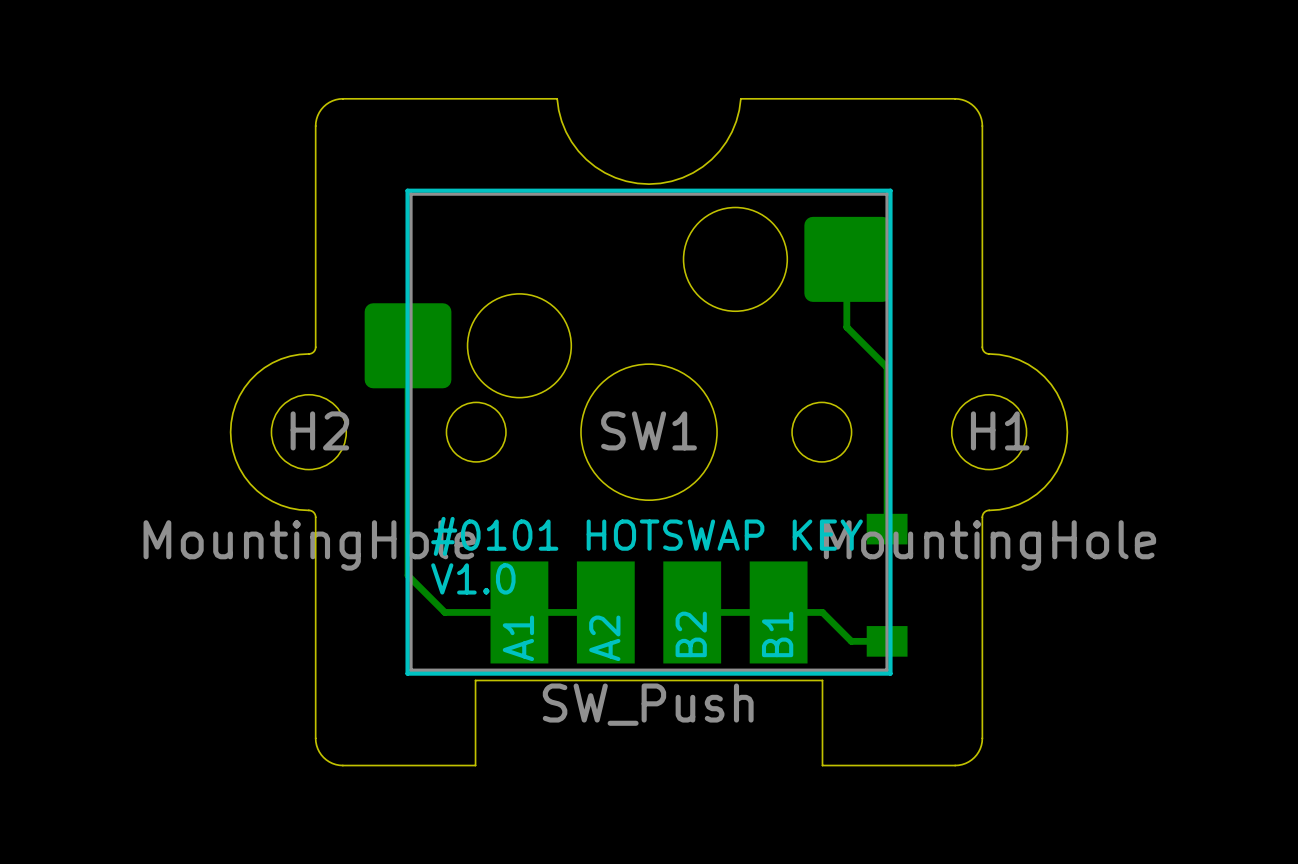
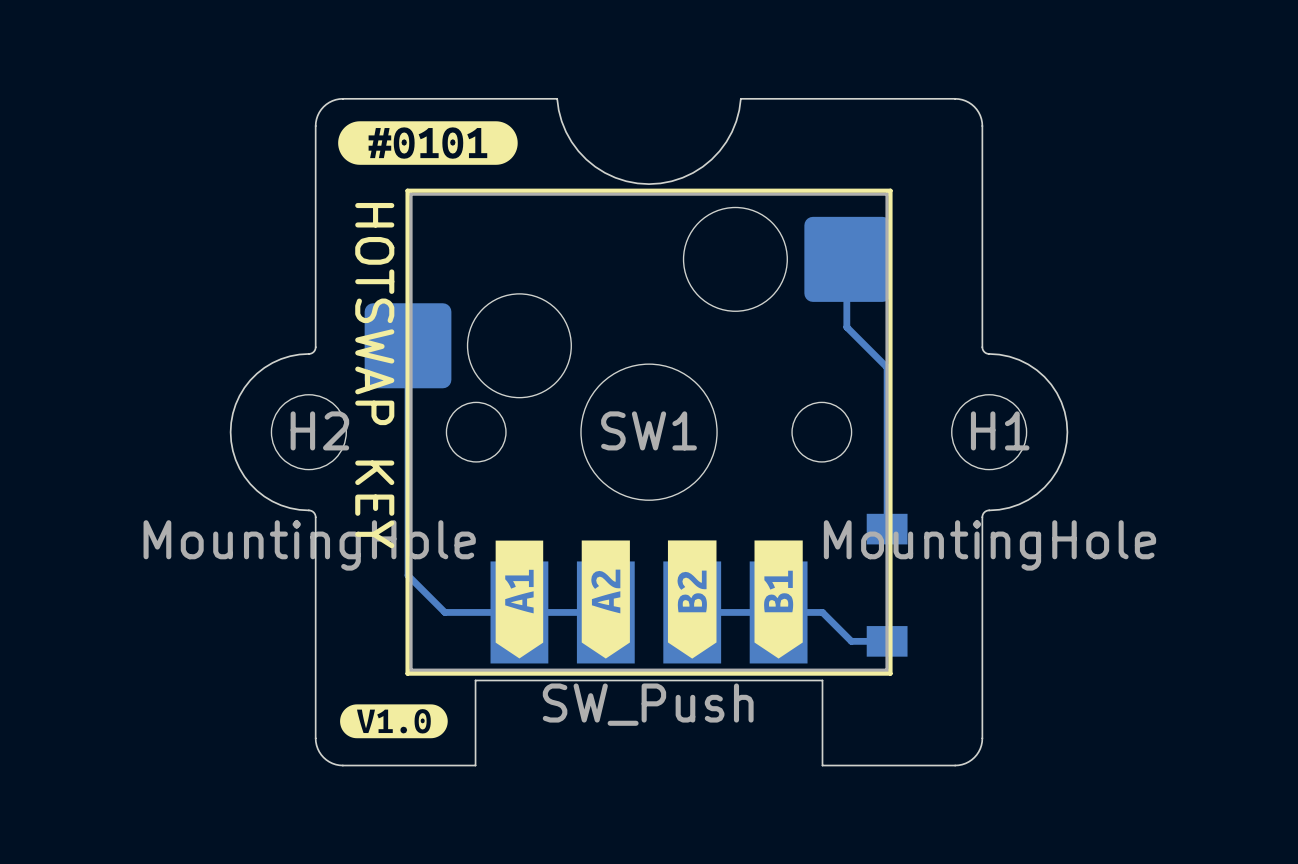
drawing: none -> [338, 121, 518, 165]
text: none -> HOTSWAP KEY (374, 375)
text: #0101 HOTSWAP KEY (647, 536) -> none
drawing: none -> [495, 540, 803, 659]
text: V1.0 (473, 578) -> none
text: B2 (691, 634) -> none
text: B1 (777, 634) -> none
text: A1 (518, 638) -> none
text: A2 (604, 638) -> none
drawing: none -> [340, 704, 448, 739]

